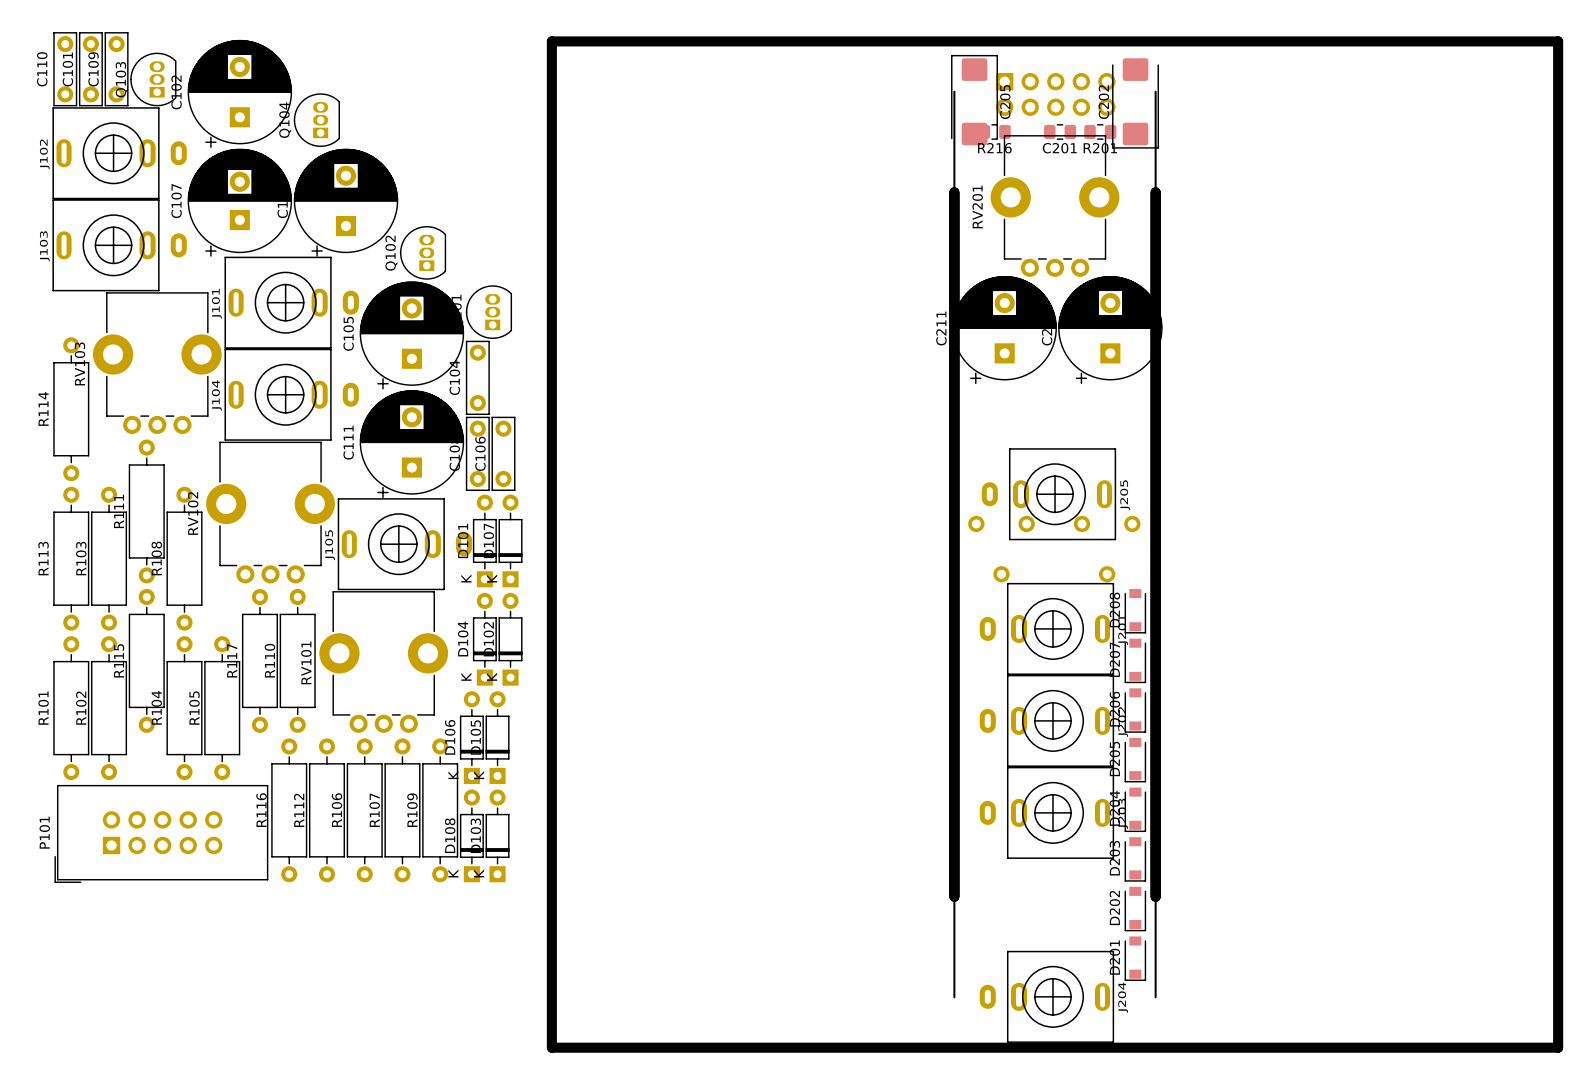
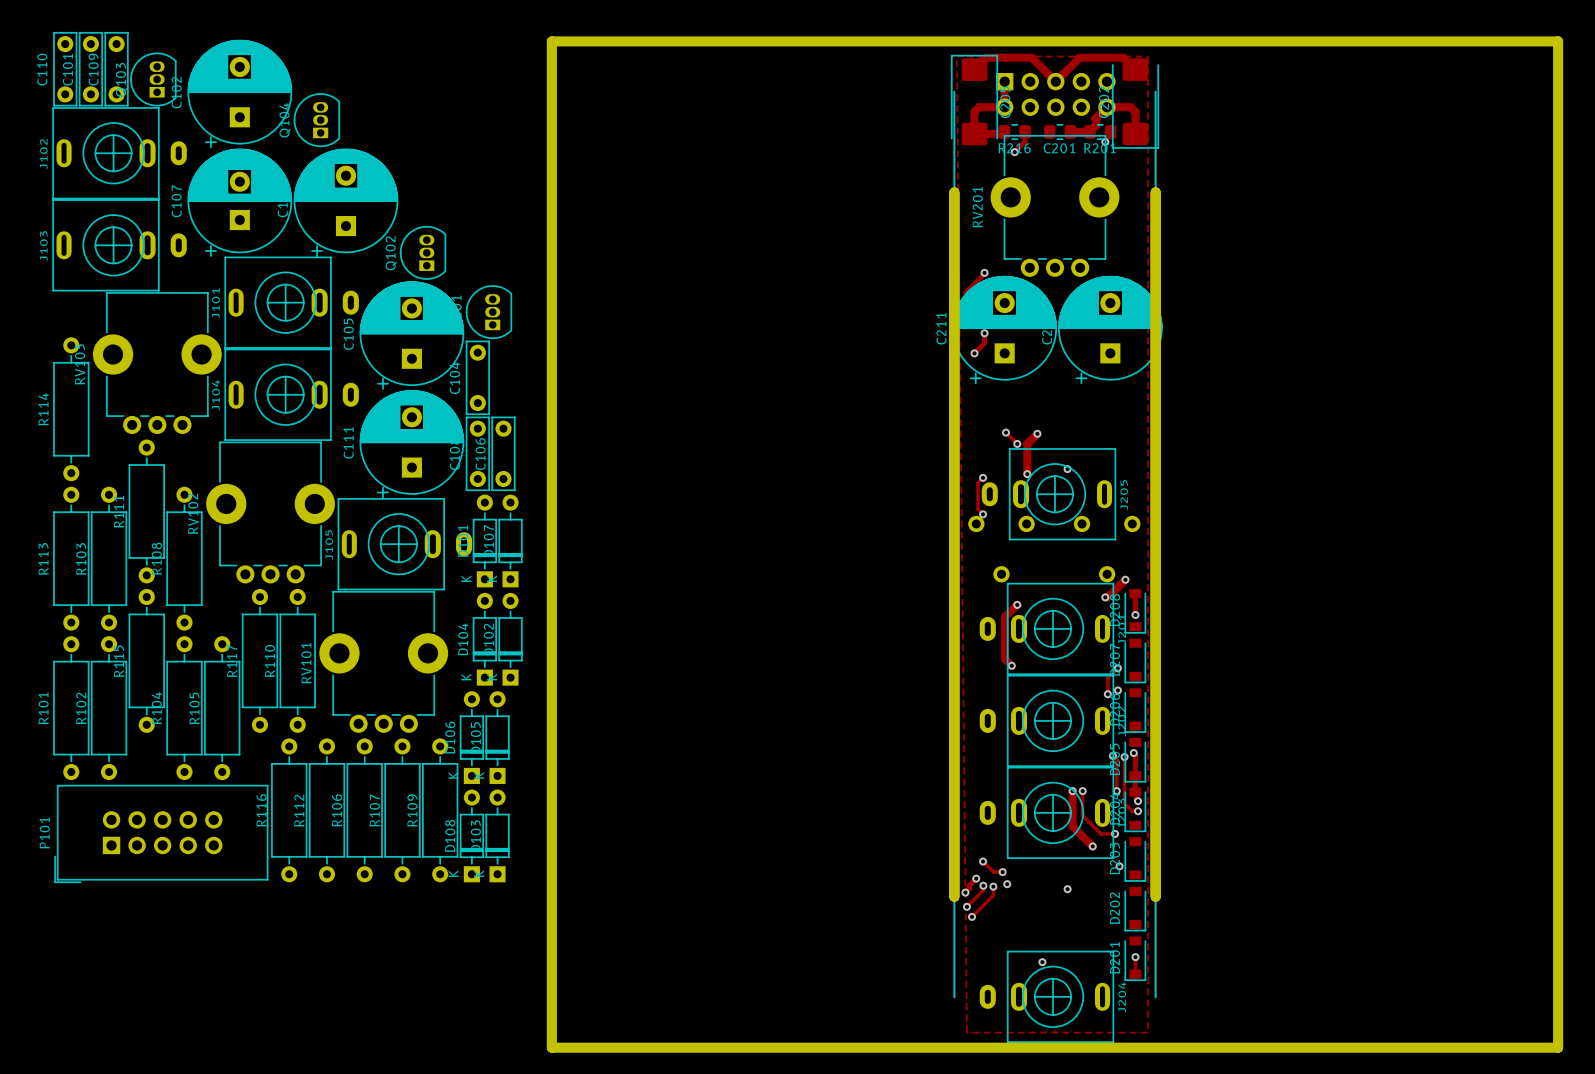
zone outline: none -> (956, 56) (1148, 56) (1148, 1032) (966, 1032) (956, 56)
track: none -> (974, 69) (986, 57) (1031, 57) (1055, 81) (1079, 57) (1123, 57) (1135, 69)
track: none -> (1004, 81) (1004, 107) (979, 107) (974, 111) (974, 133) (1002, 133) (1004, 131)
R216 position: (994, 131) -> (1014, 131)
track: none -> (1025, 131) (1025, 141) (1014, 152)
track: none -> (1070, 131) (1089, 131) (1096, 125) (1095, 118) (1106, 107) (1130, 107) (1135, 111) (1135, 133)
via: none -> (1105, 142)
via: none -> (1014, 152)
track: none -> (984, 272) (965, 292)
via: none -> (984, 272)
track: none -> (984, 333) (984, 343) (974, 353)
via: none -> (984, 333)
via: none -> (974, 353)
track: none -> (1005, 432) (1017, 443)
via: none -> (1005, 432)
track: none -> (1037, 433) (1027, 443) (1027, 474)
via: none -> (1037, 433)
via: none -> (1017, 443)
via: none -> (1067, 469)
via: none -> (1027, 474)
track: none -> (983, 477) (977, 482) (977, 509) (983, 514)
via: none -> (983, 477)
via: none -> (983, 514)
track: none -> (1125, 579) (1107, 597) (1105, 597)
via: none -> (1125, 579)
track: none -> (1135, 593) (1135, 614)
via: none -> (1105, 597)
track: none -> (1017, 604) (1004, 617) (1004, 658) (1011, 665)
via: none -> (1017, 604)
via: none -> (1135, 614)
via: none -> (1011, 665)
track: none -> (1117, 668) (1107, 678) (1107, 694)
via: none -> (1117, 668)
via: none -> (1117, 690)
via: none -> (1107, 694)
track: none -> (1133, 753) (1135, 754) (1135, 800) (1138, 801)
via: none -> (1133, 753)
track: none -> (1112, 755) (1116, 759) (1116, 791)
via: none -> (1112, 755)
track: none -> (1124, 757) (1124, 803) (1132, 811) (1138, 811)
via: none -> (1124, 757)
track: none -> (1072, 791) (1072, 826) (1092, 846)
via: none -> (1072, 791)
track: none -> (1082, 791) (1082, 815) (1100, 833) (1115, 833)
via: none -> (1082, 791)
via: none -> (1116, 791)
via: none -> (1138, 801)
via: none -> (1138, 811)
via: none -> (1115, 833)
via: none -> (1092, 846)
track: none -> (983, 861) (993, 872) (1002, 872)
via: none -> (983, 861)
via: none -> (1119, 866)
via: none -> (1002, 872)
track: none -> (976, 878) (965, 892)
via: none -> (976, 878)
via: none -> (1007, 884)
track: none -> (983, 885) (983, 890) (966, 906)
via: none -> (983, 885)
track: none -> (993, 886) (993, 895) (971, 916)
via: none -> (993, 886)
via: none -> (1067, 889)
via: none -> (965, 892)
via: none -> (966, 906)
via: none -> (971, 916)
track: none -> (1135, 957) (1135, 974)
via: none -> (1135, 957)
via: none -> (1042, 962)

